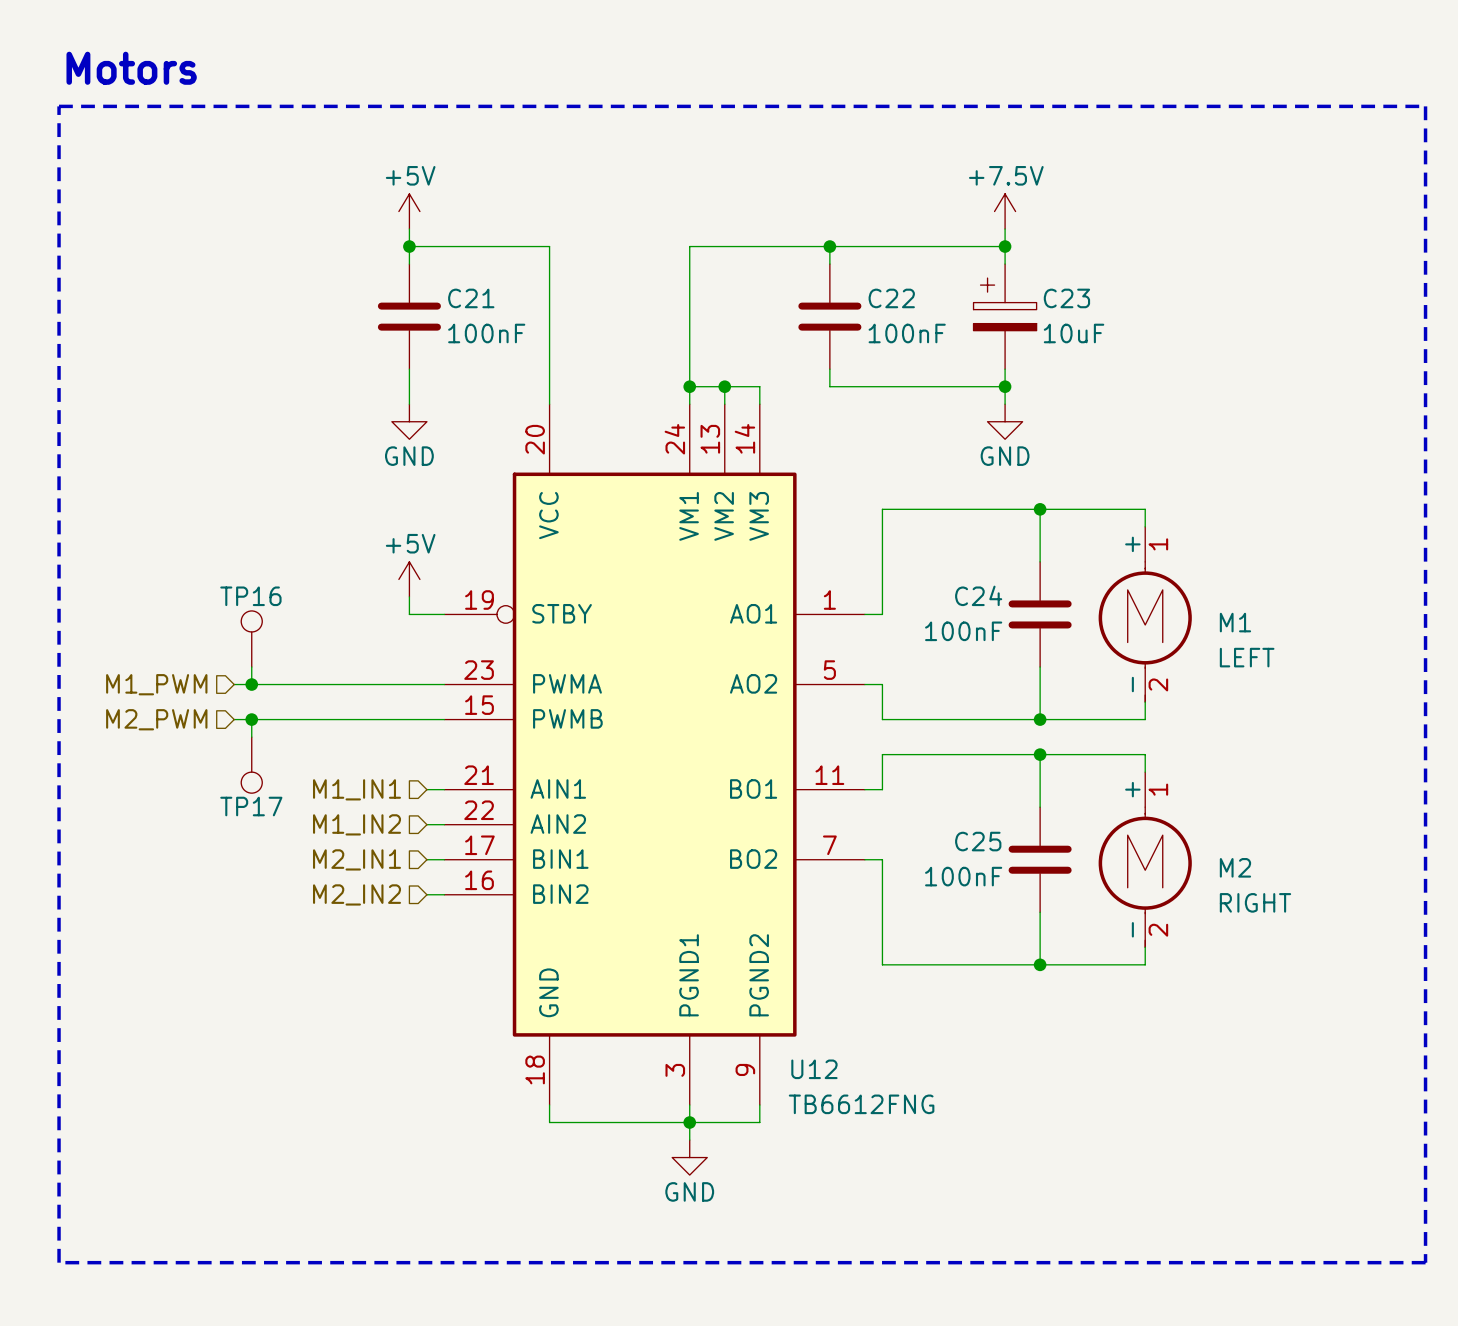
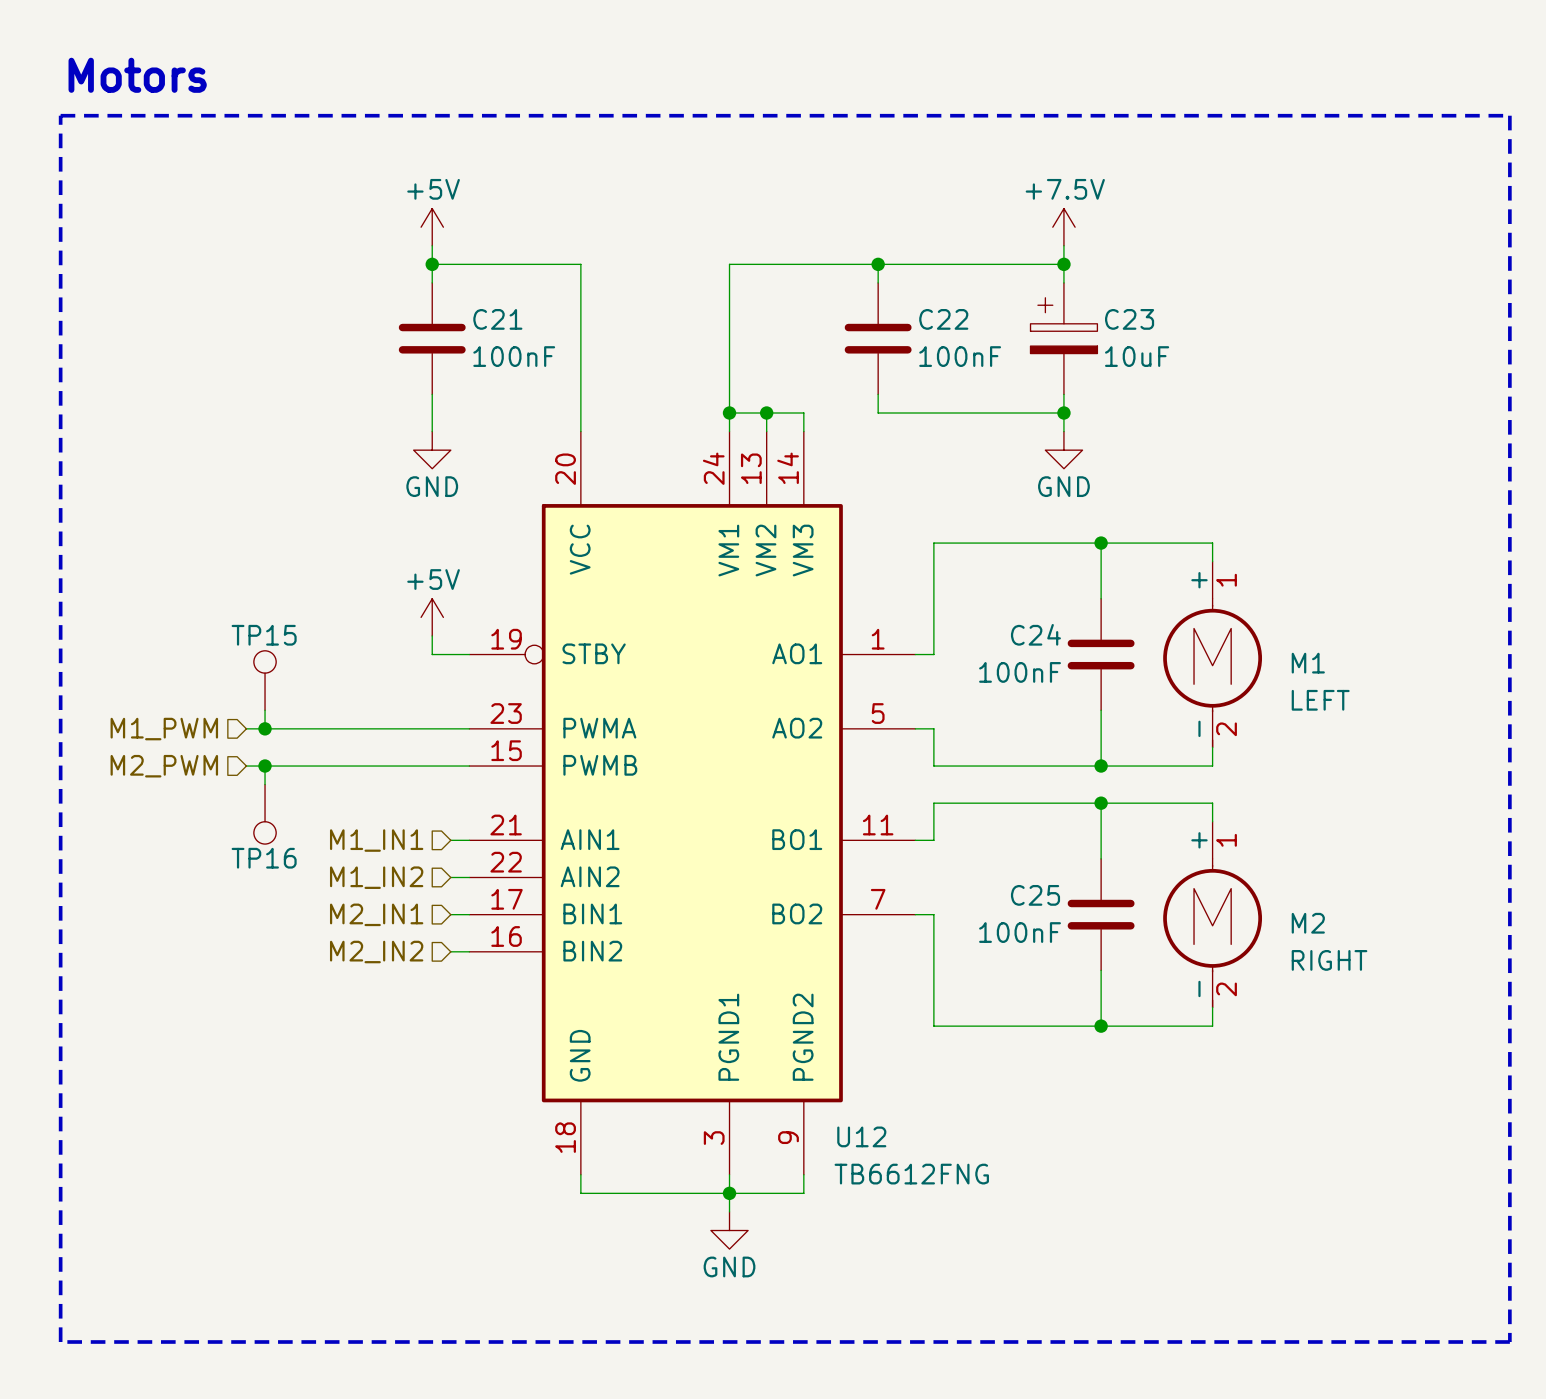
TP16 name: TP16 (250, 596) -> TP15 (264, 635)
TP17 name: TP17 (251, 806) -> TP16 (264, 858)

